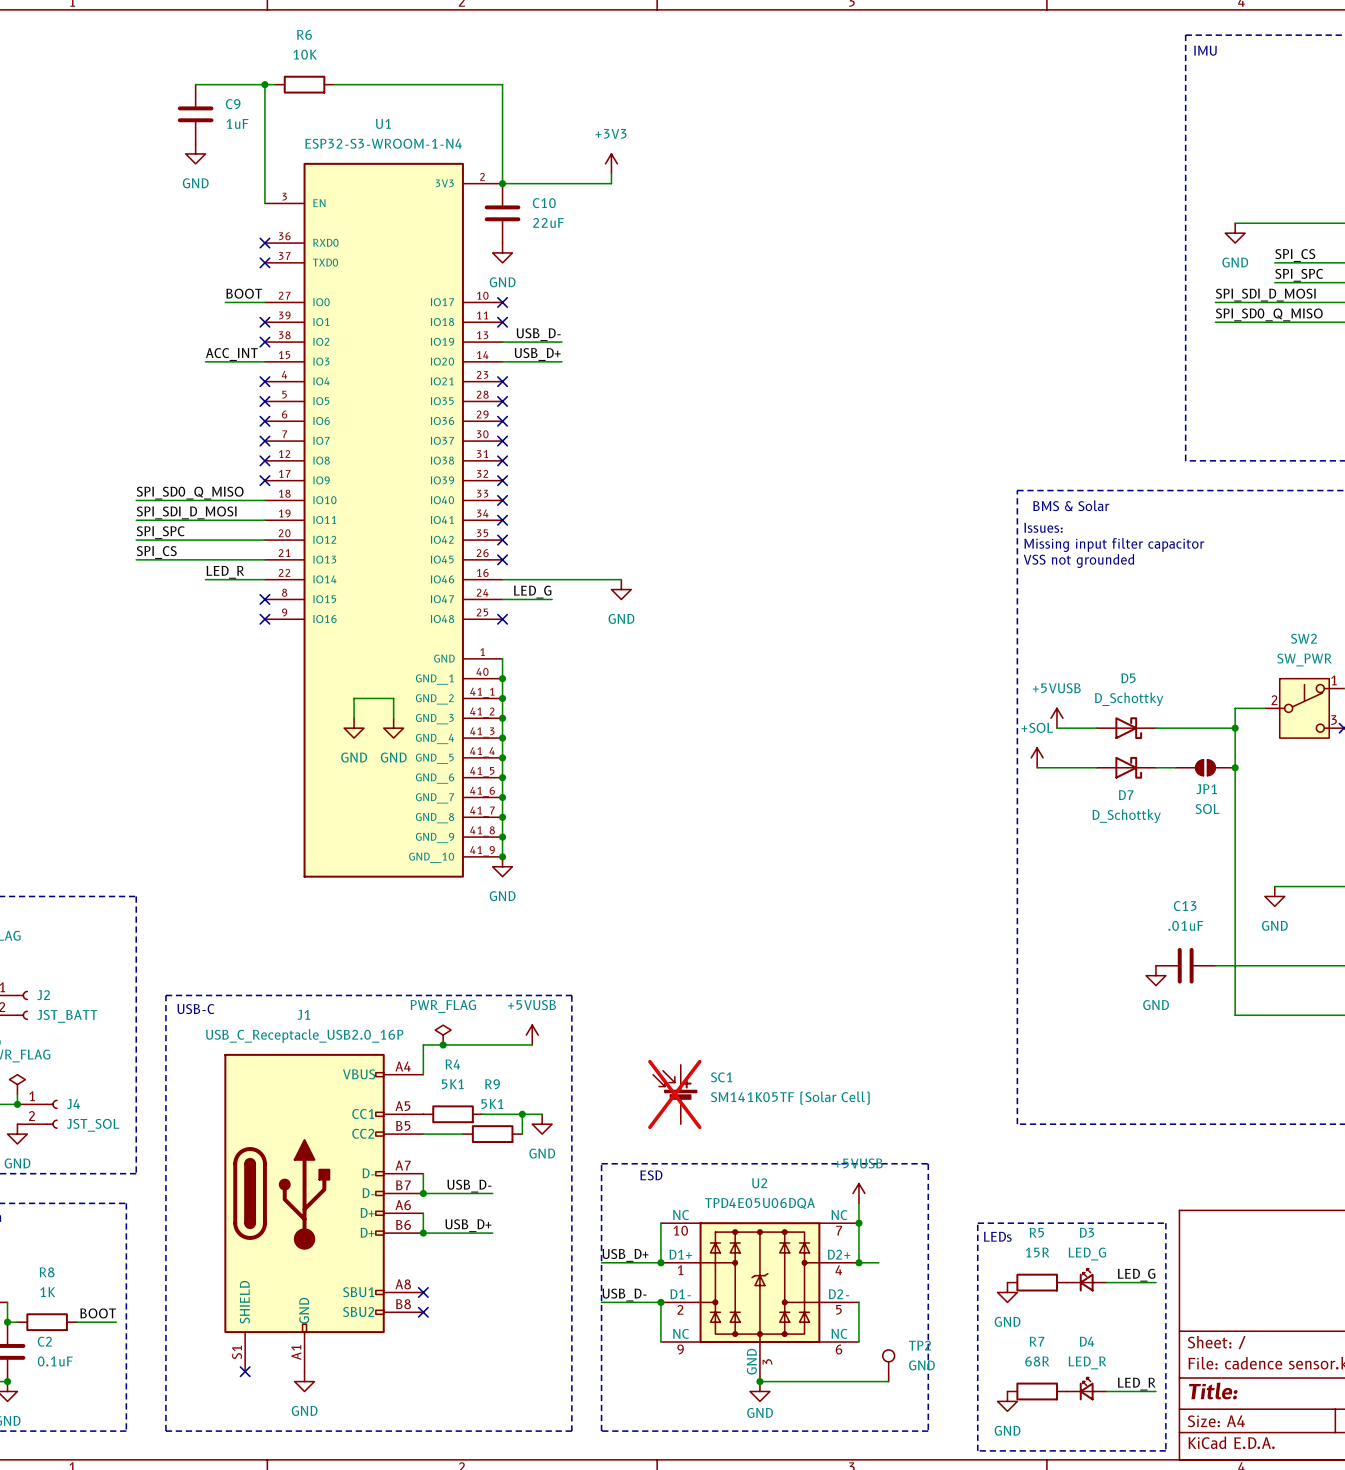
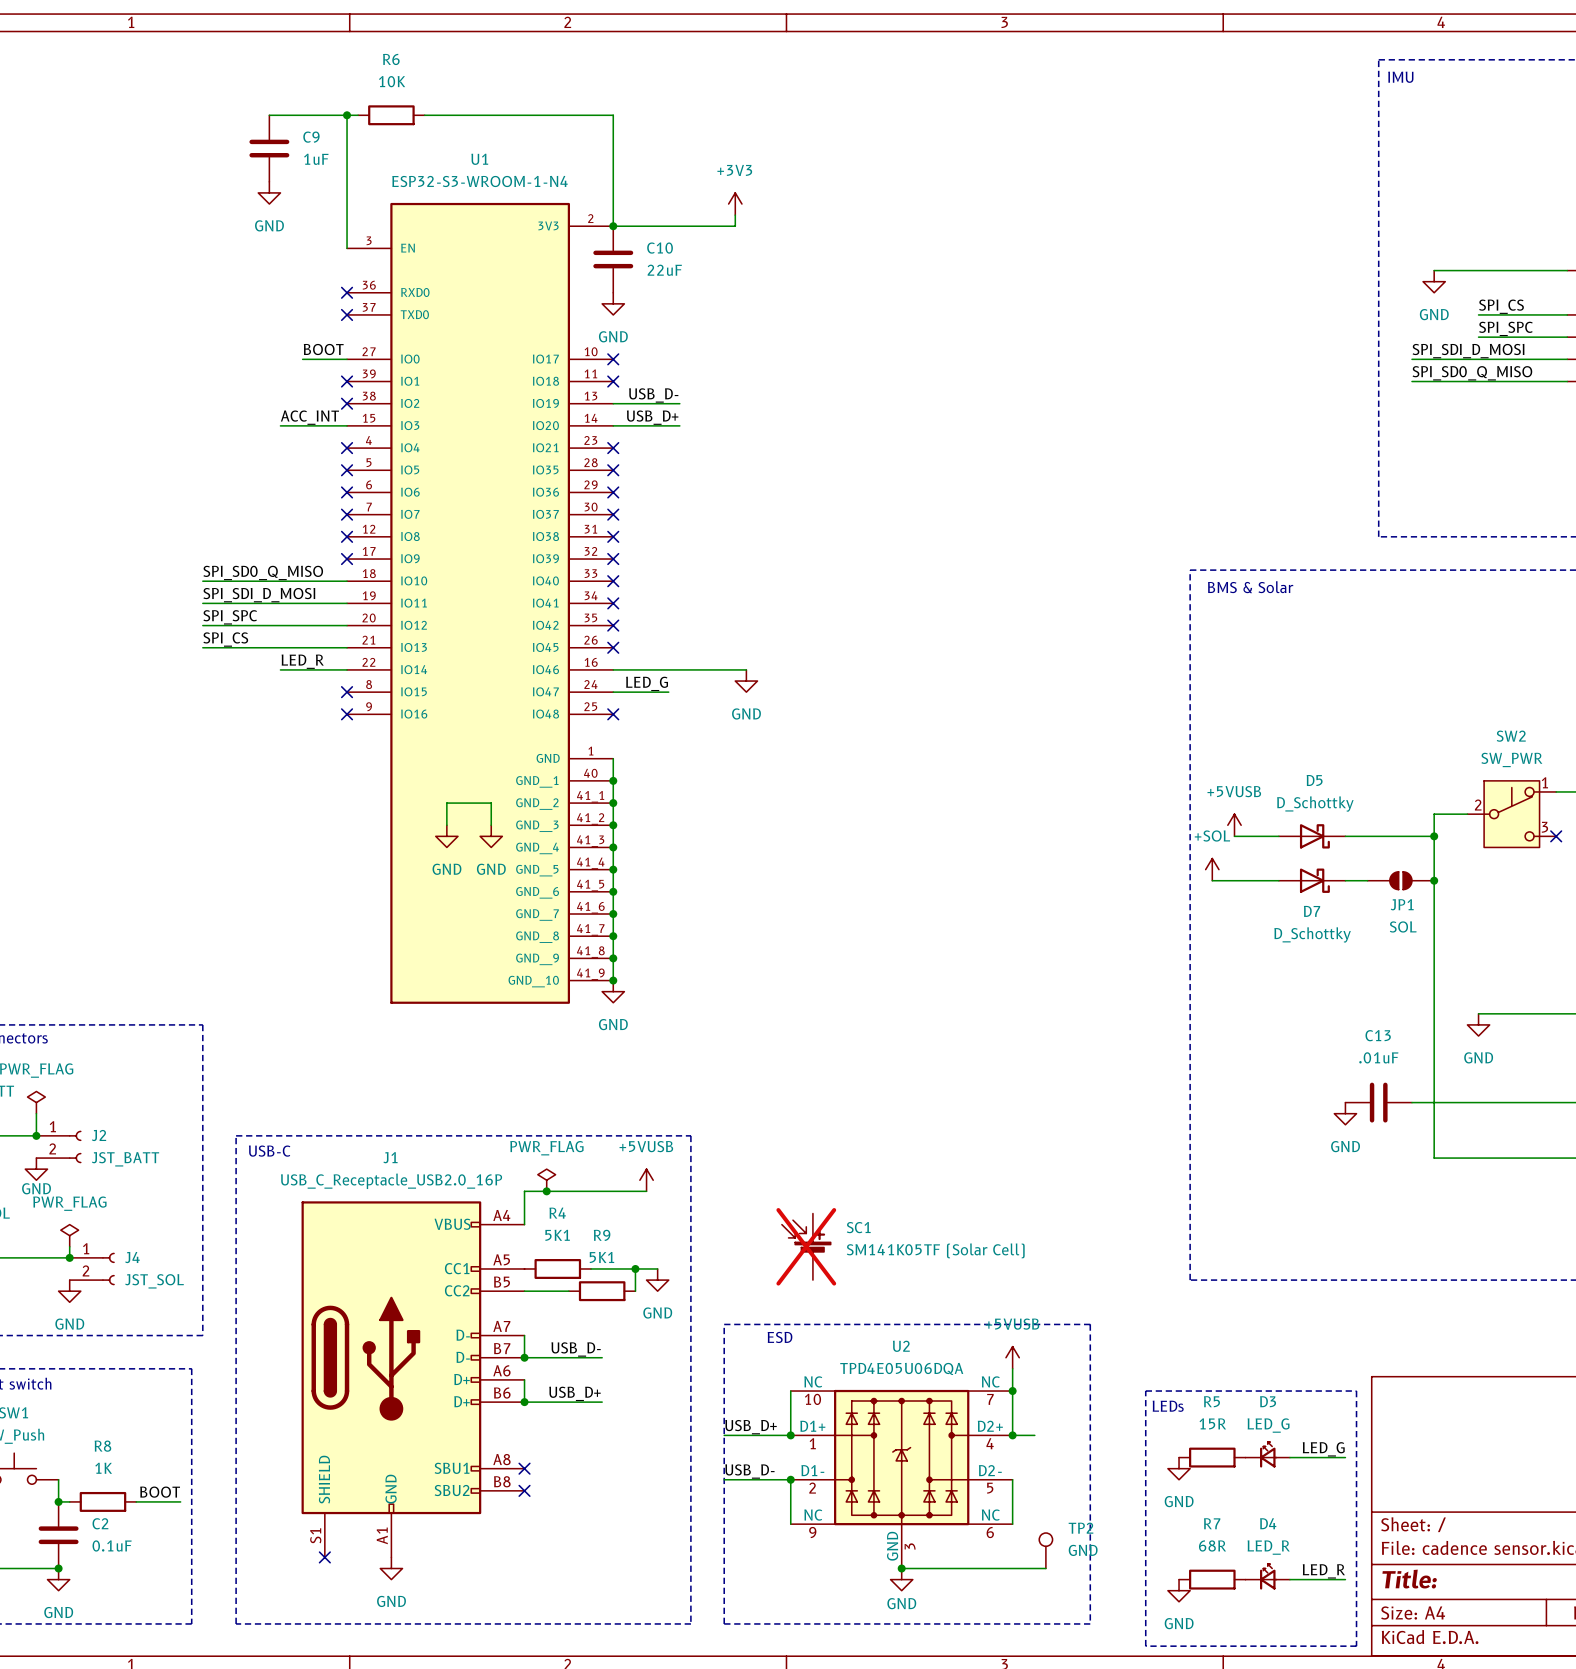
text: Issues: (1043, 527) -> none
text: Missing input filter capacitor (1114, 545) -> none
text: VSS not grounded (1078, 560) -> none

